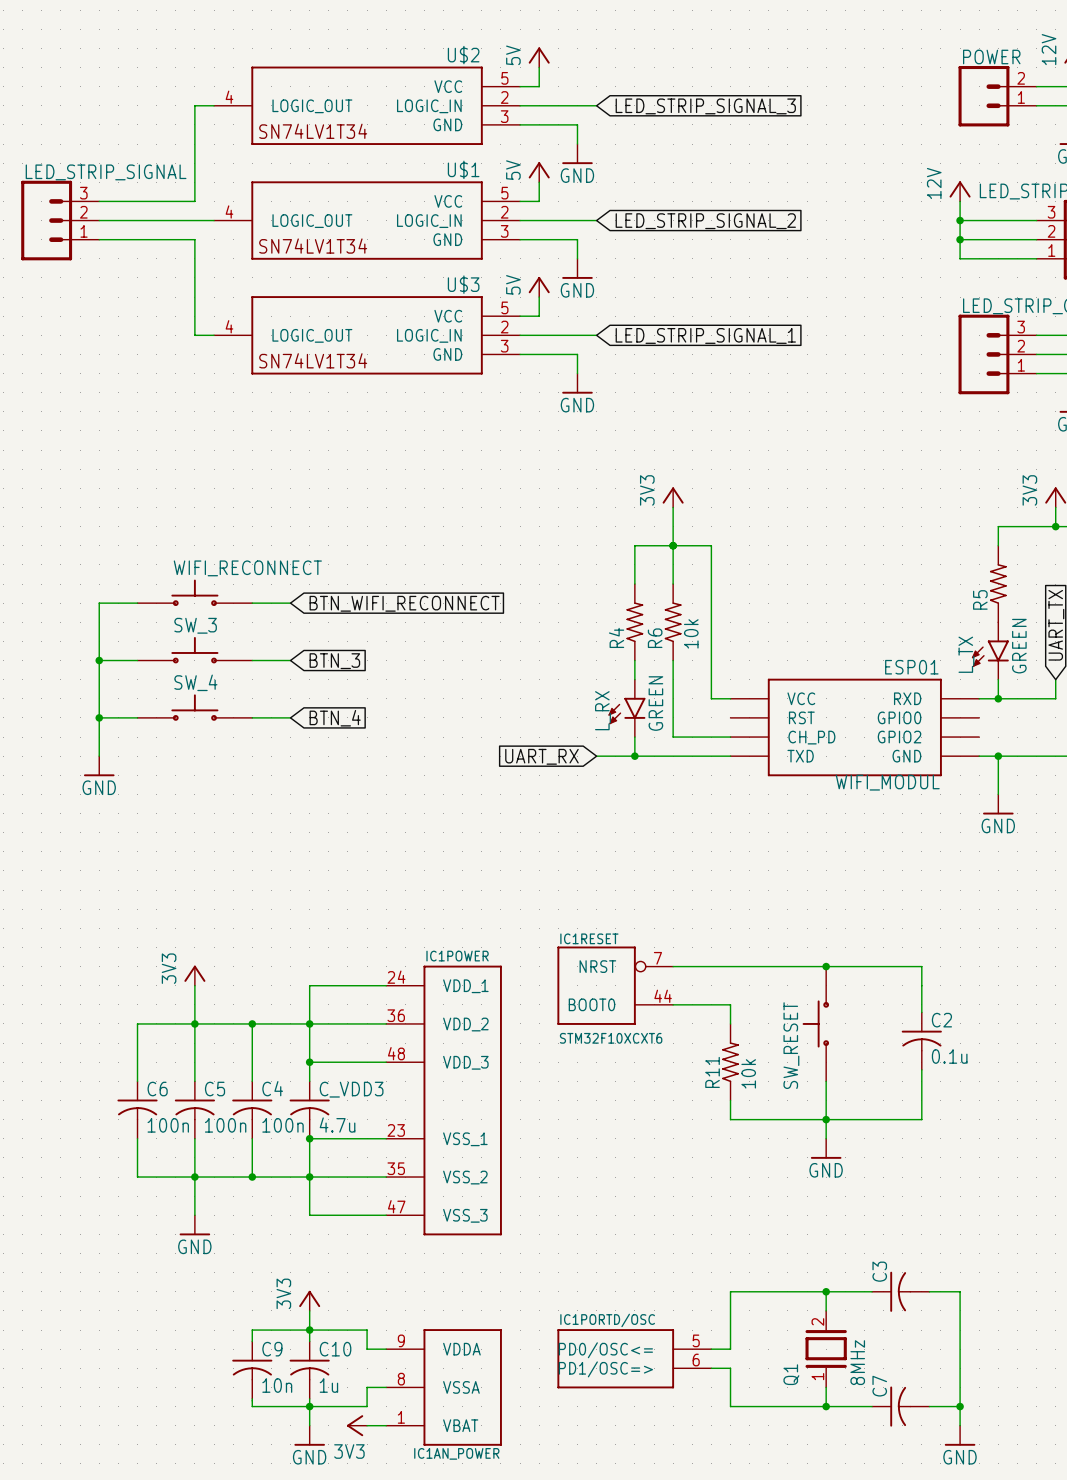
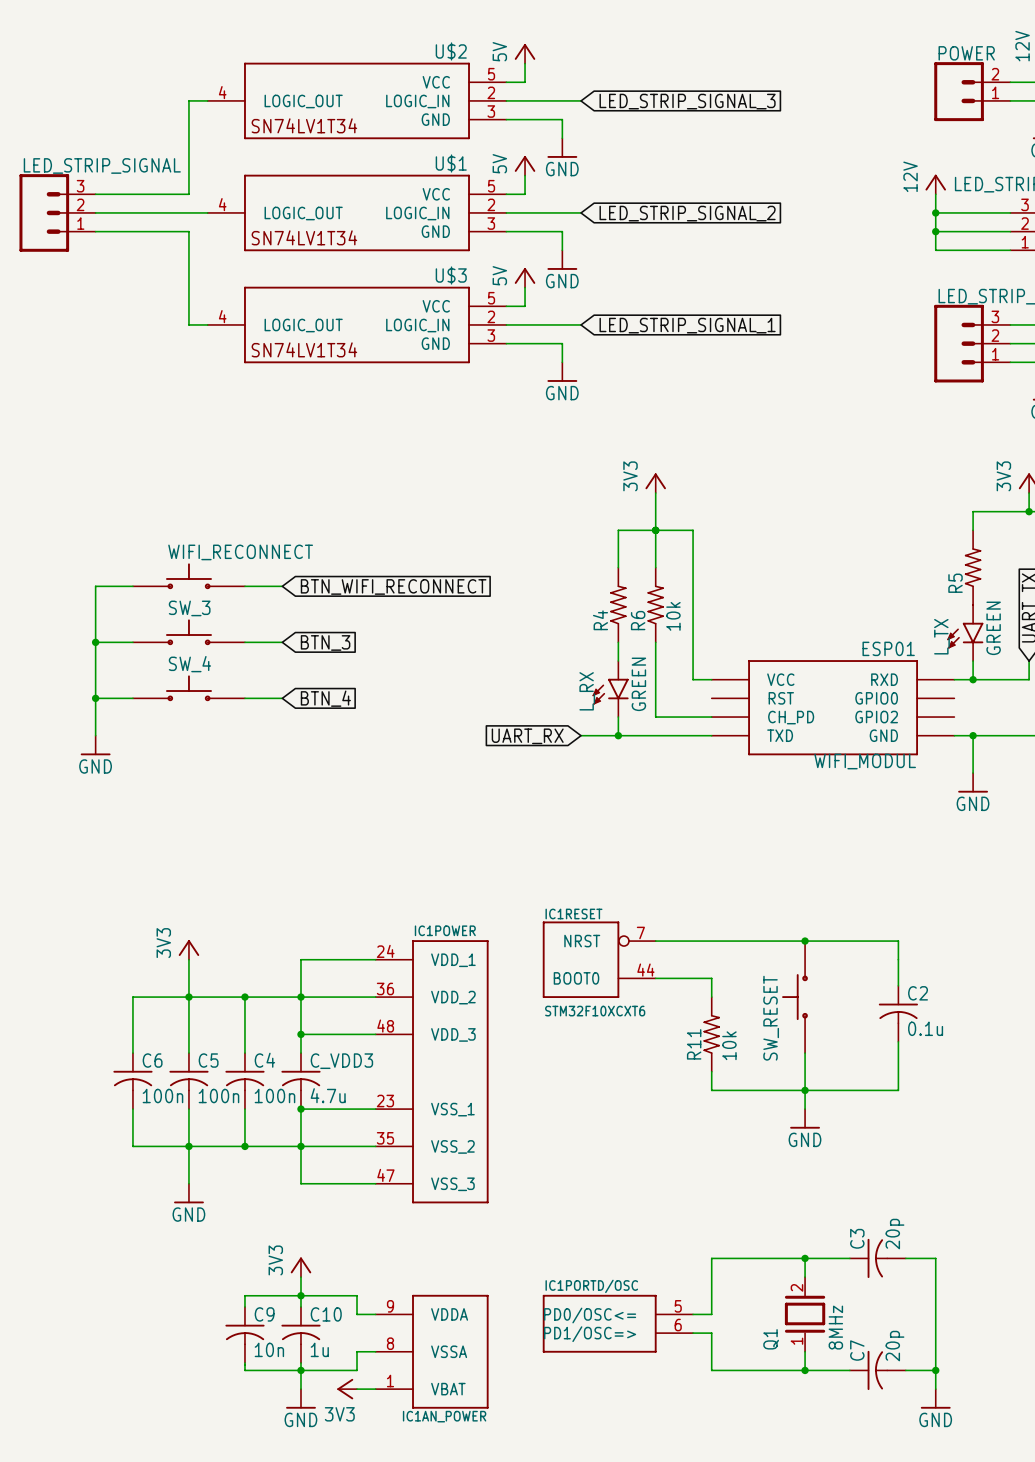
C3 value: none -> 20p (894, 1234)
C7 value: none -> 20p (894, 1346)

